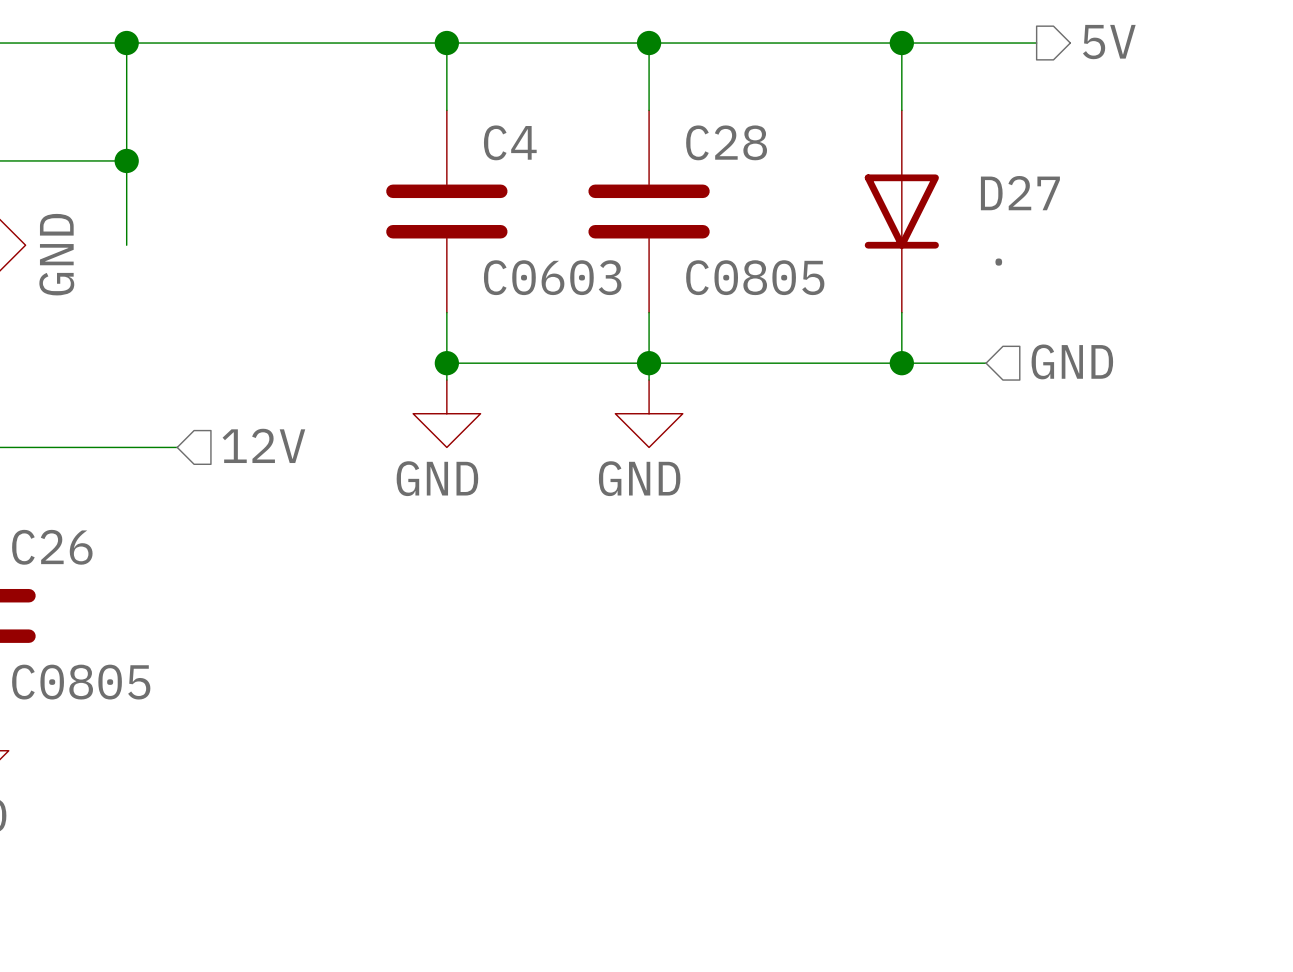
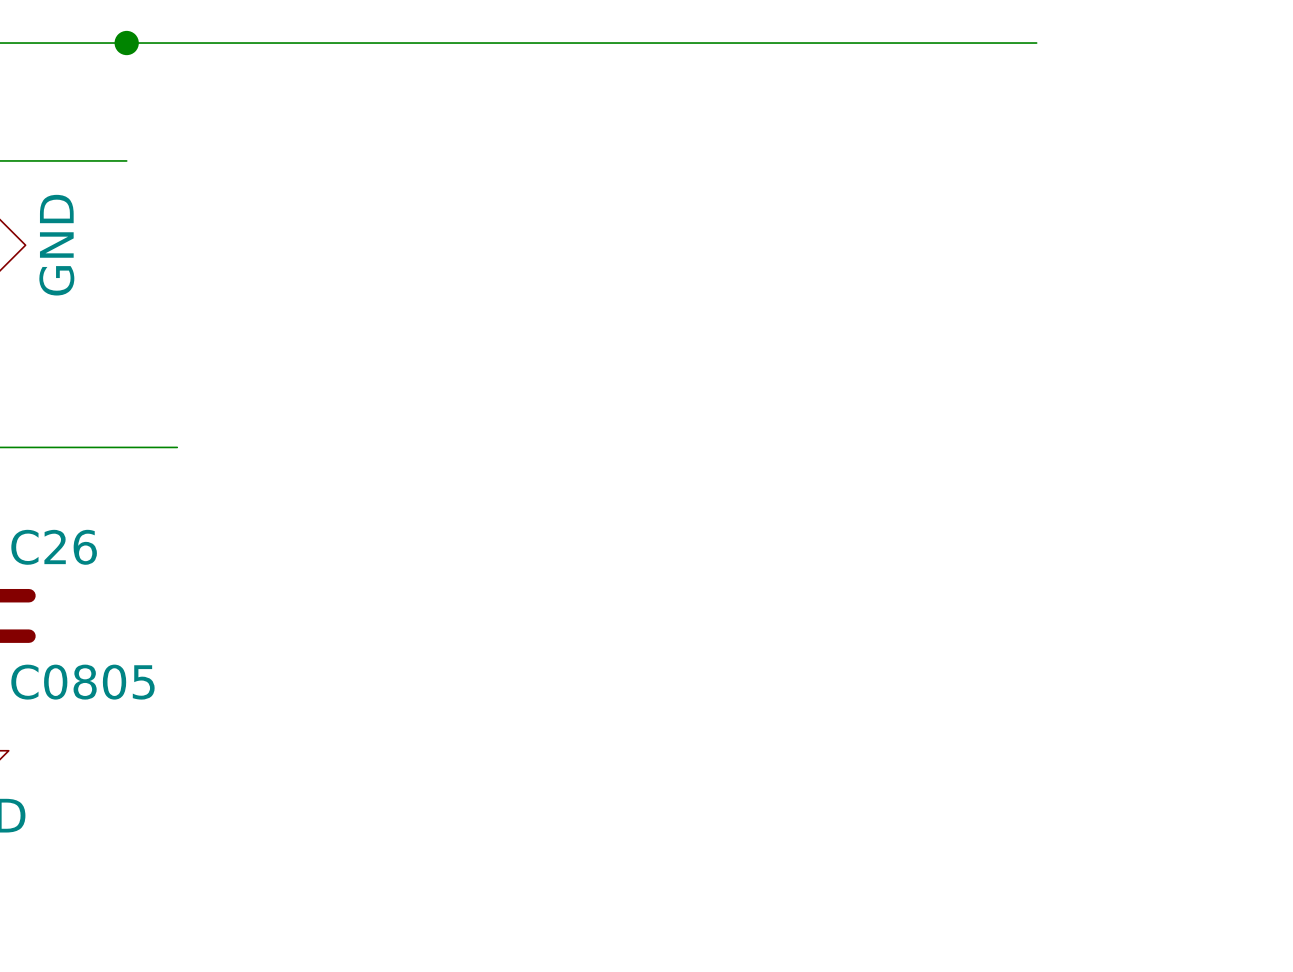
hierarchical label: 5V (1109, 42) -> none
wire: (126, 43) (126, 245) -> none
wire: (446, 43) (446, 110) -> none
junction: (446, 43) -> none
wire: (649, 43) (649, 110) -> none
junction: (649, 43) -> none
wire: (901, 43) (901, 110) -> none
junction: (901, 43) -> none
junction: (126, 160) -> none
C4: C0603 (446, 211) -> none
C28: C0805 (649, 211) -> none
D27: . (901, 211) -> none
wire: (446, 312) (446, 380) -> none
wire: (649, 312) (649, 380) -> none
wire: (901, 312) (901, 363) -> none
hierarchical label: GND (1072, 361) -> none
wire: (446, 363) (986, 363) -> none
junction: (446, 363) -> none
junction: (649, 363) -> none
junction: (901, 363) -> none
power symbol: GND (446, 413) -> none
power symbol: GND (649, 413) -> none
hierarchical label: 12V (263, 445) -> none

